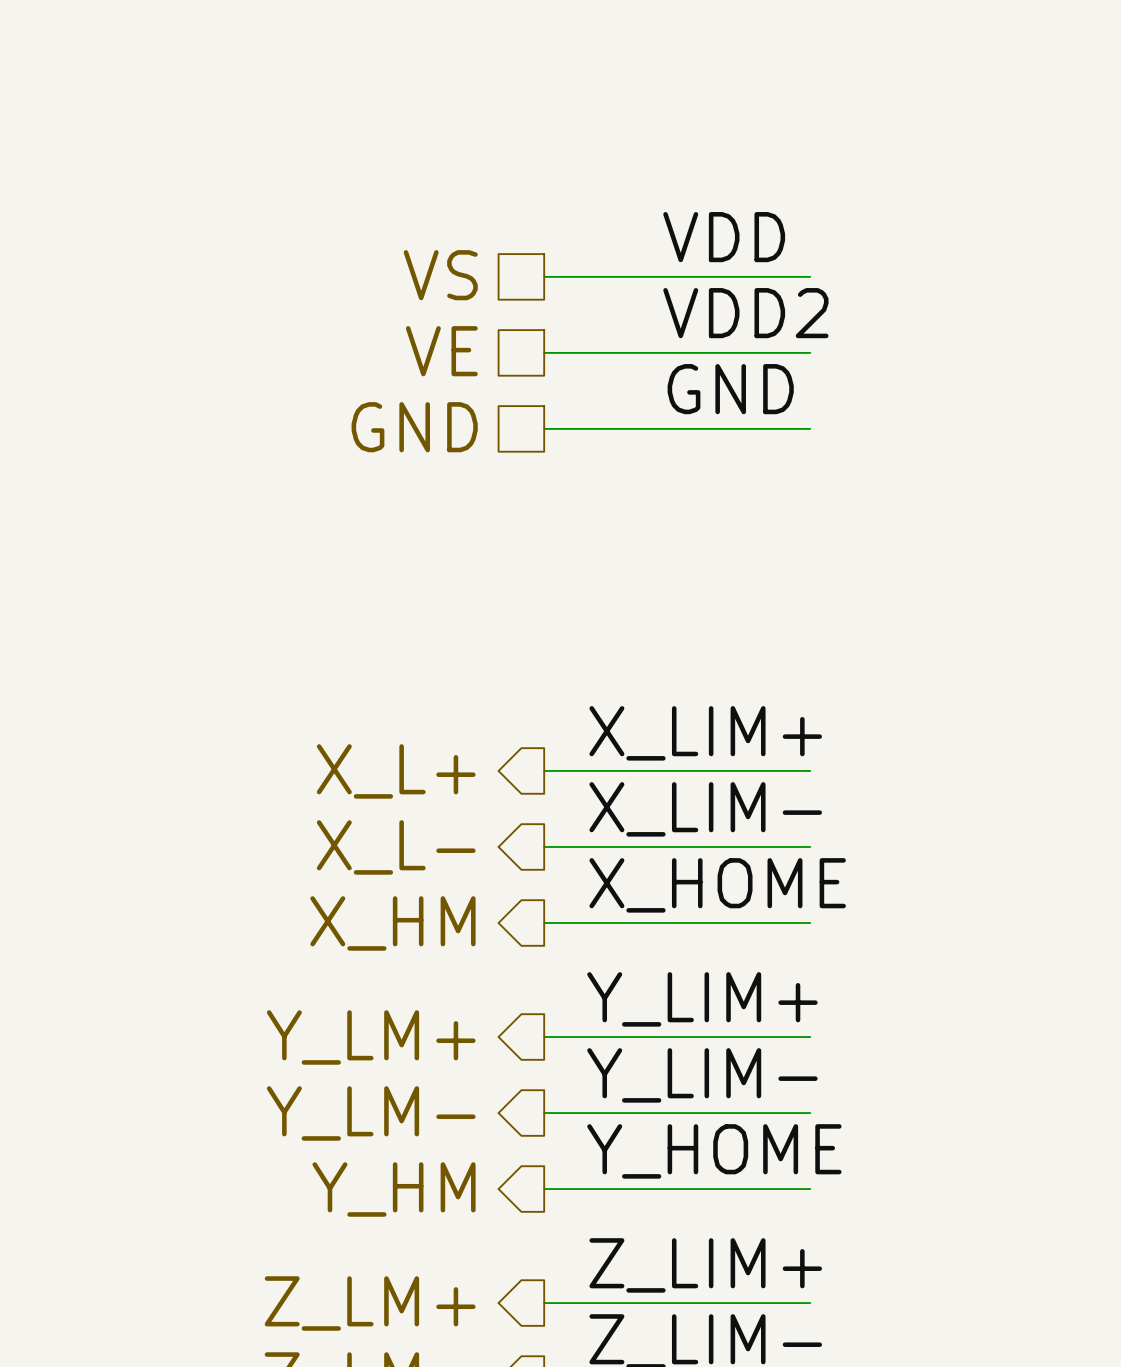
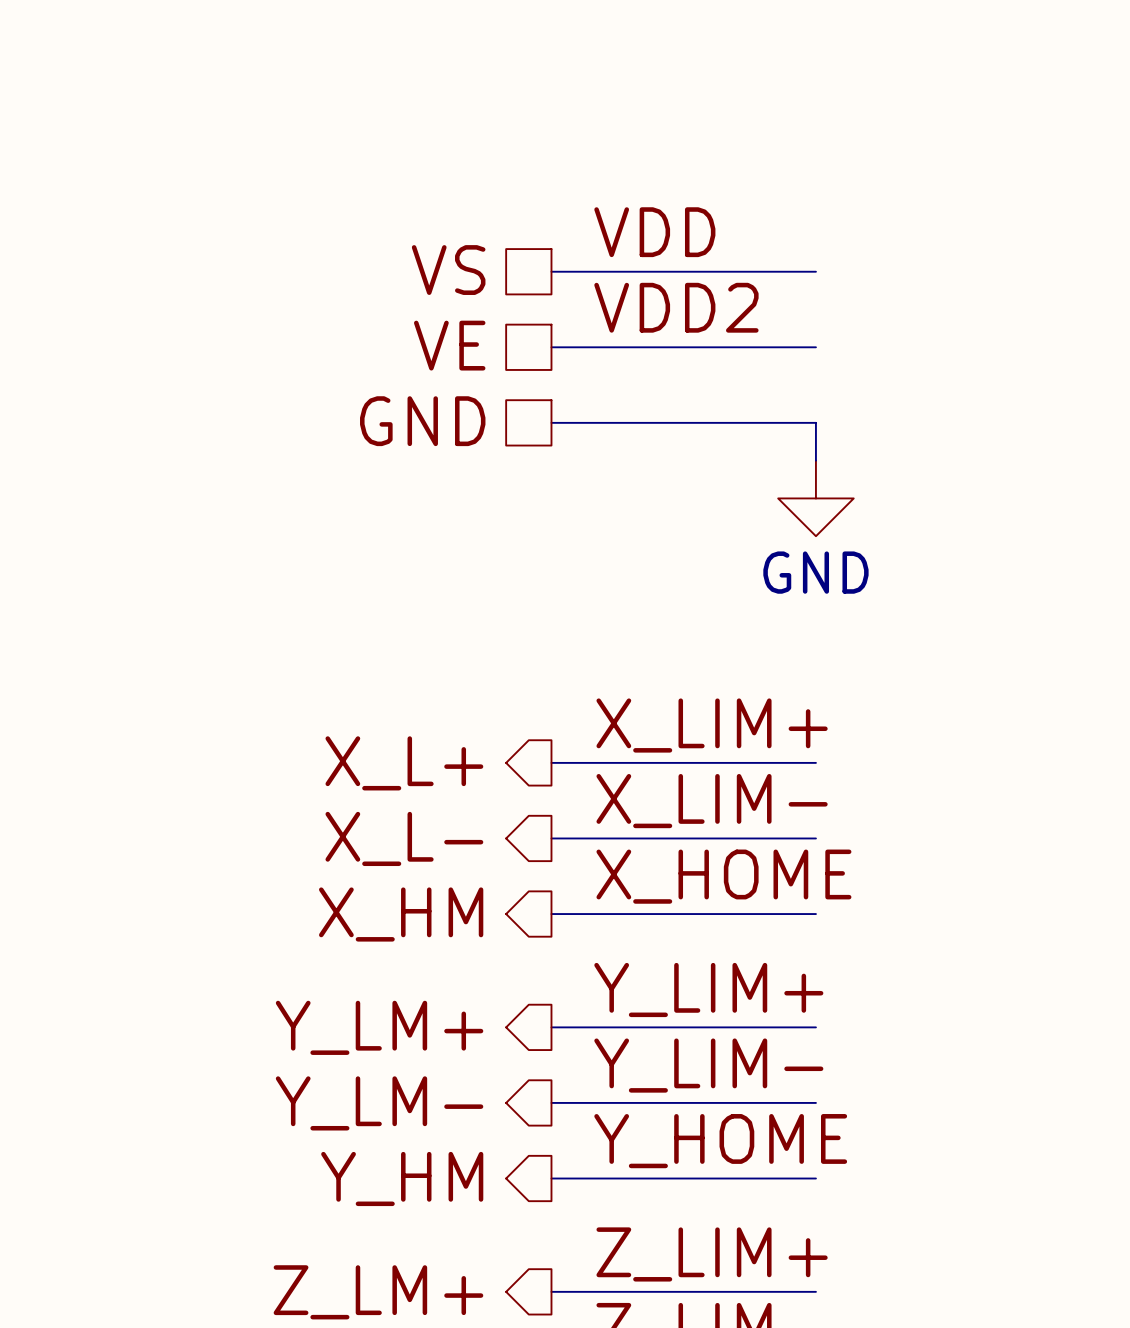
label position: VDD (724, 237) -> VDD (654, 232)
label position: VDD2 (745, 313) -> VDD2 (676, 307)
label: GND (730, 389) -> none
wire: none -> (815, 422) (815, 460)
power symbol: none -> GND (815, 498)

